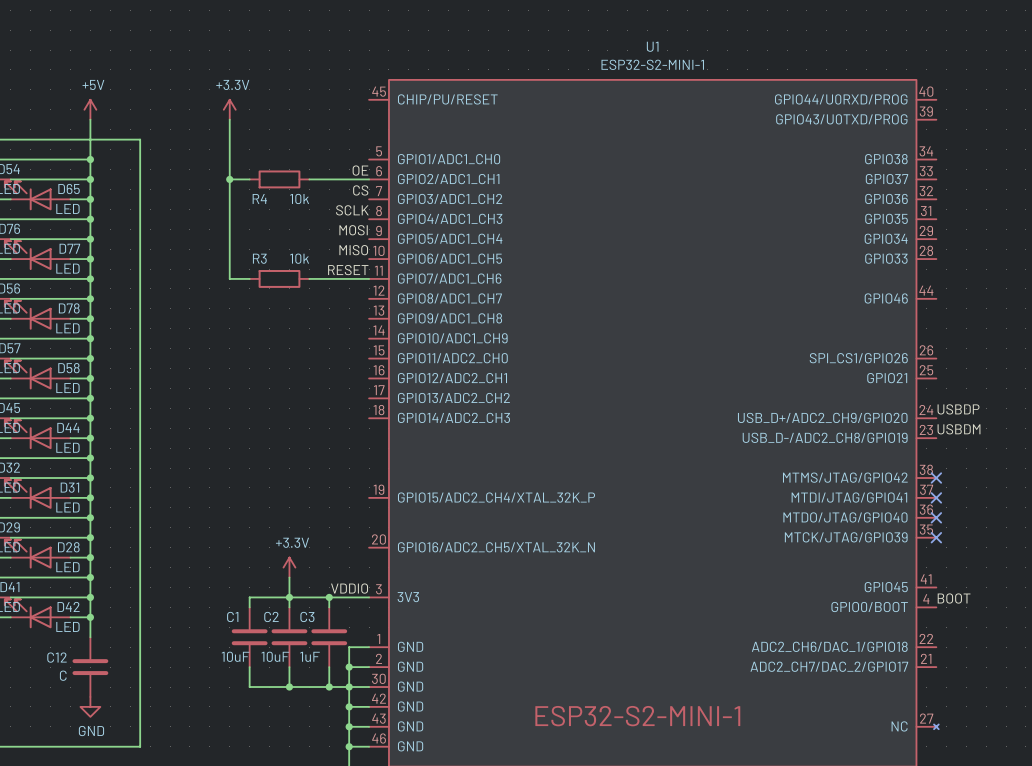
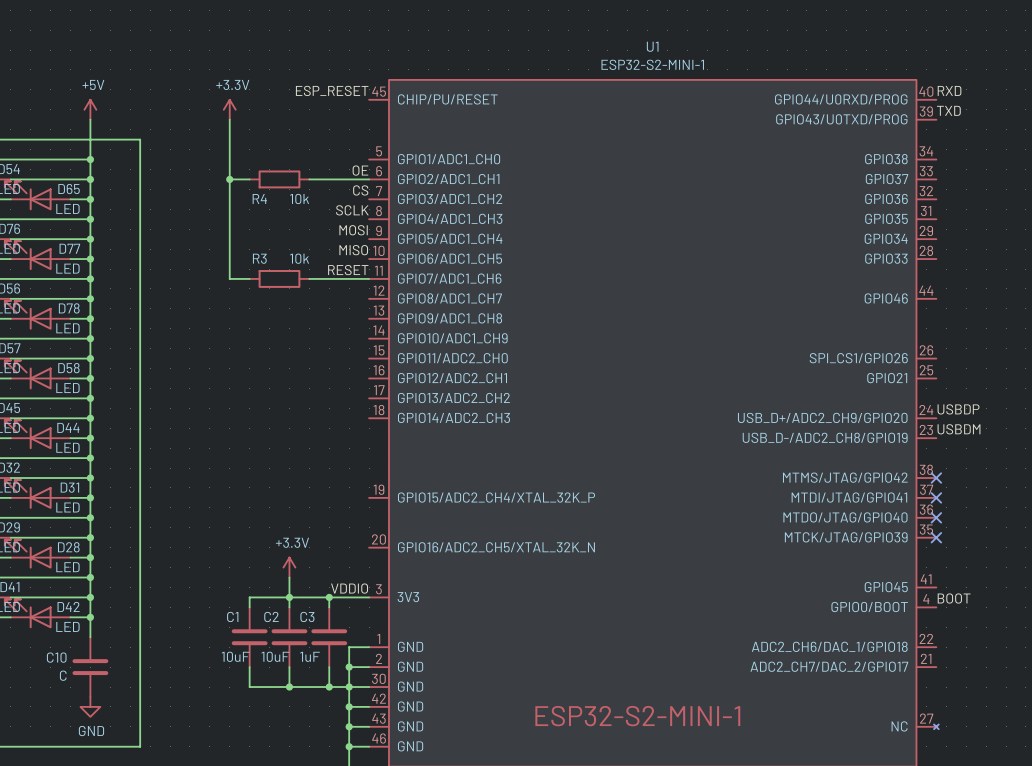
label: none -> ESP_RESET (332, 90)
label: none -> RXD (949, 90)
label: none -> TXD (948, 110)
C12 name: C12 (57, 657) -> C10 (56, 657)

